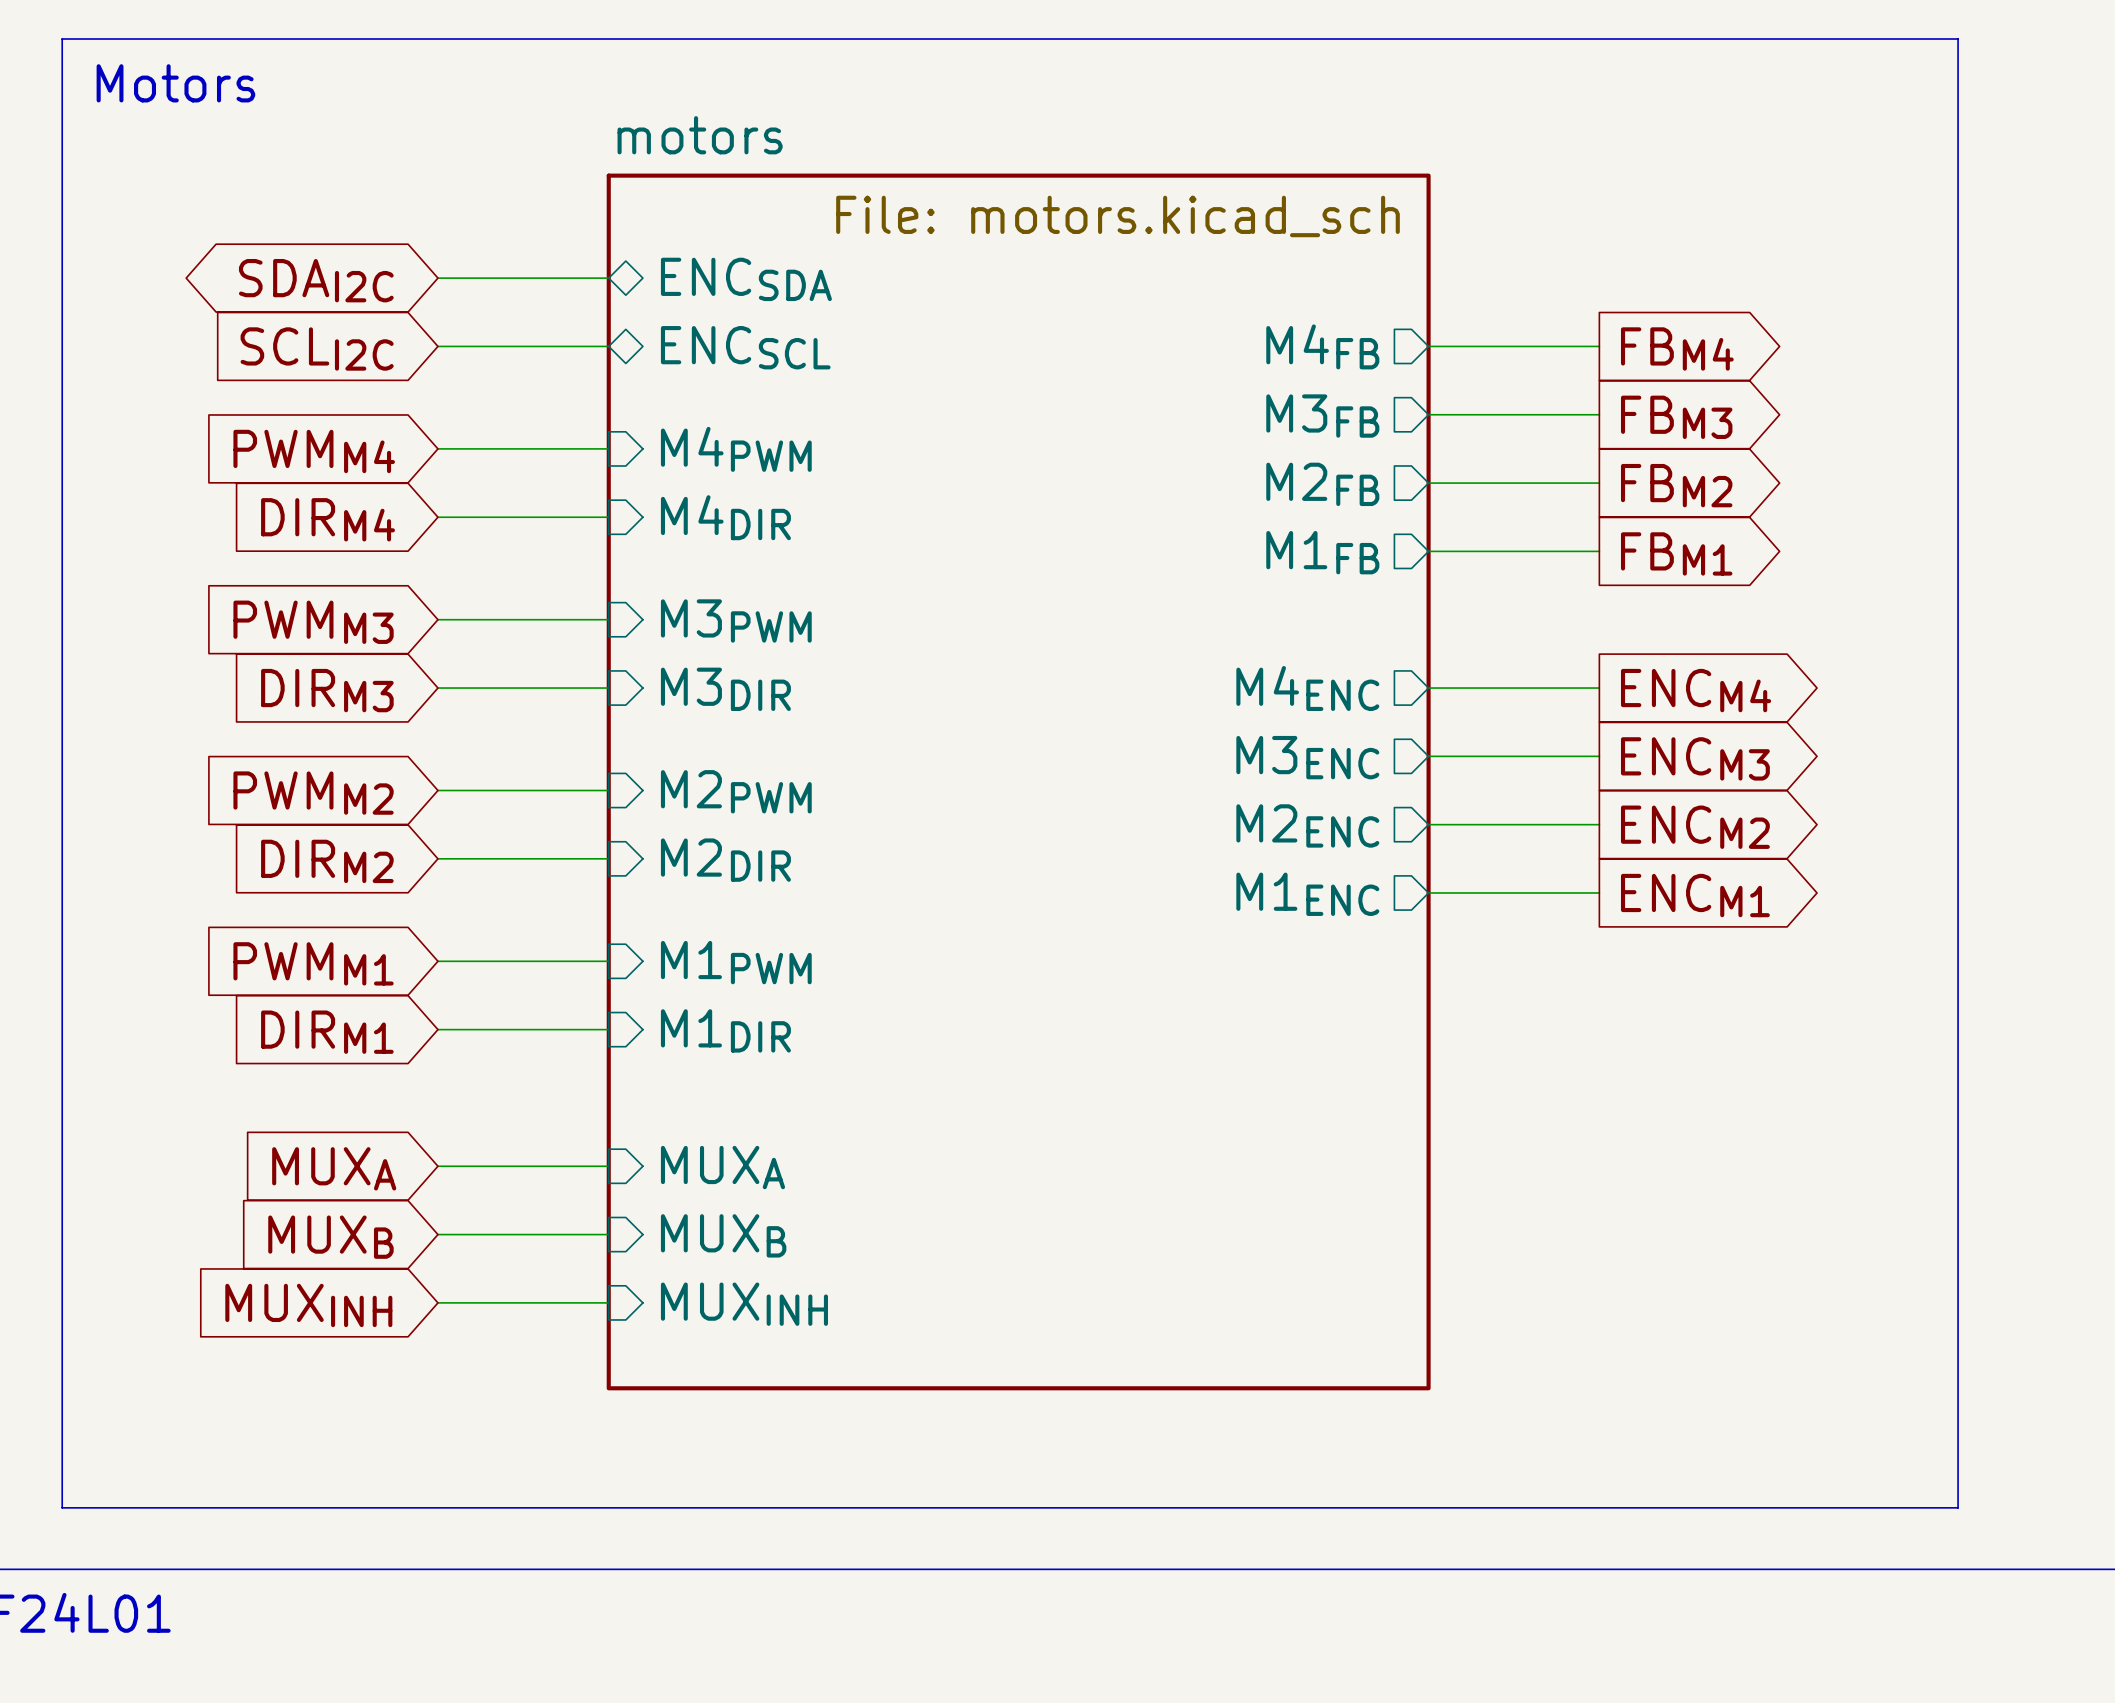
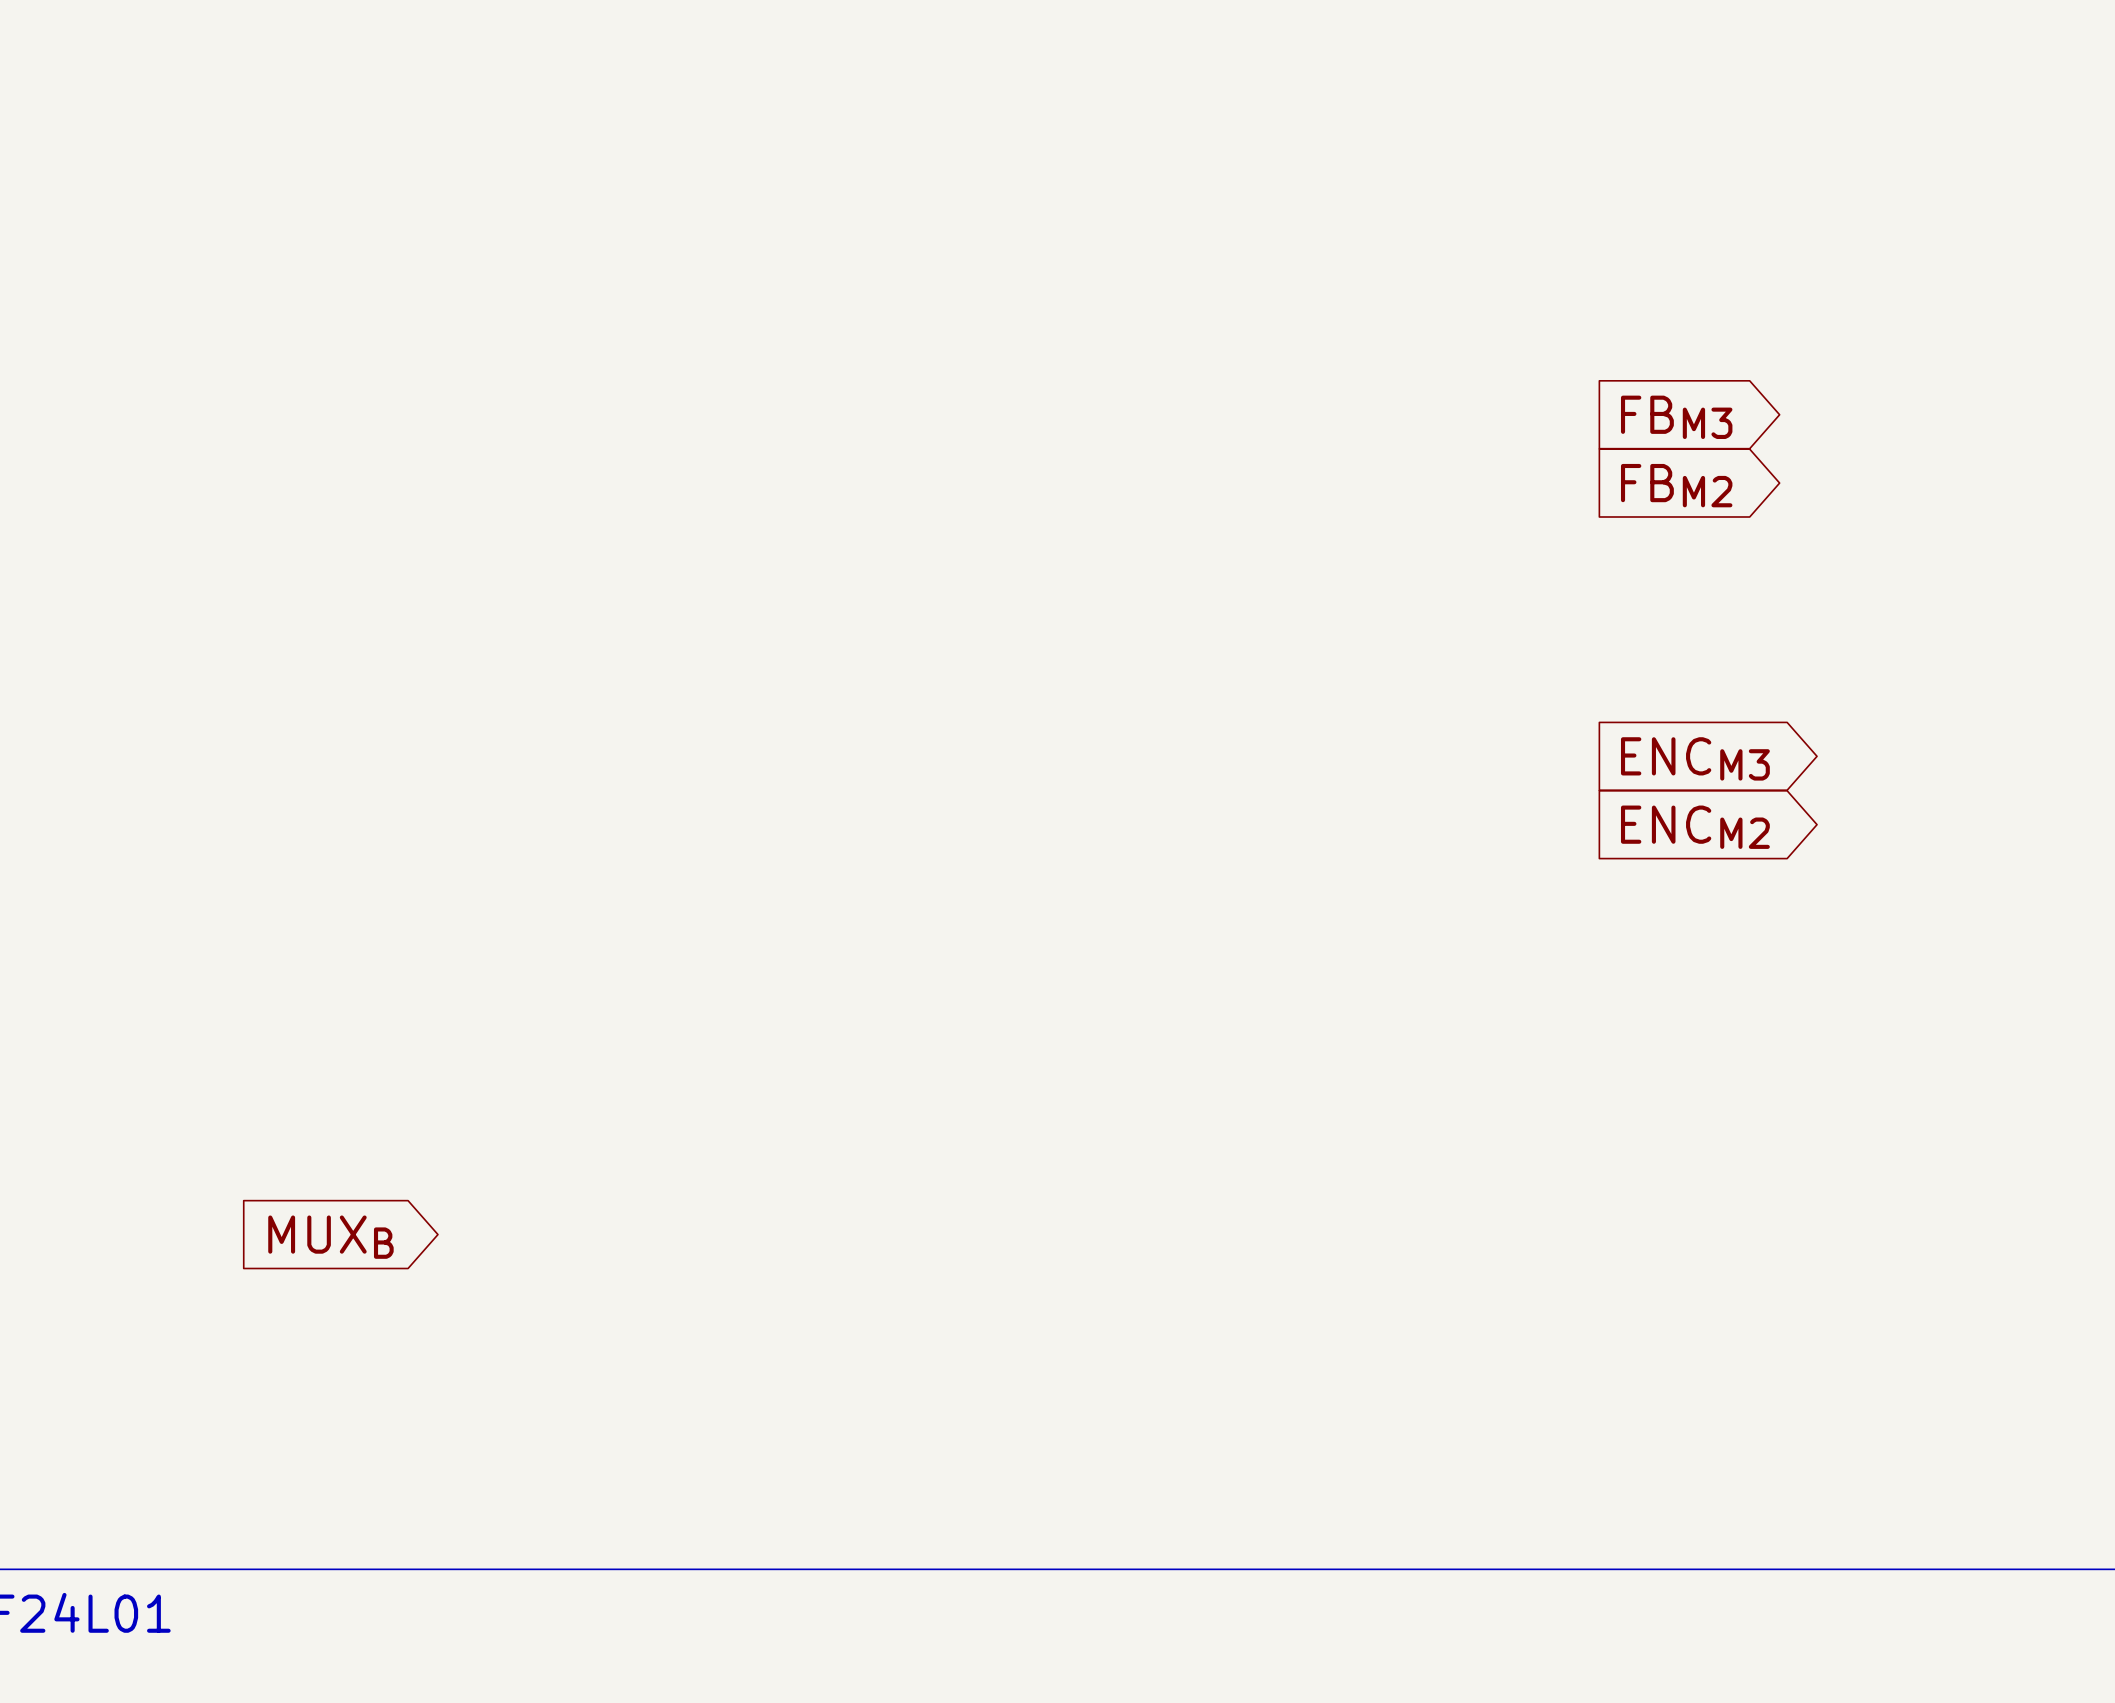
line: (62, 39) (1958, 39) (1958, 1507) (62, 1507) (62, 39) -> none
text: Motors (175, 83) -> none
wire: (437, 278) (608, 278) -> none
sheet pin: ENCSDA (746, 279) -> none
global label: SDAI2C (316, 280) -> none
wire: (437, 346) (608, 346) -> none
sheet pin: M4FB (1322, 346) -> none
wire: (1428, 346) (1599, 346) -> none
sheet pin: ENCSCL (745, 347) -> none
global label: SCLI2C (317, 348) -> none
global label: FBM4 (1677, 348) -> none
wire: (1428, 414) (1599, 414) -> none
sheet pin: M3FB (1322, 416) -> none
wire: (437, 448) (608, 448) -> none
sheet pin: M4PWM (736, 449) -> none
global label: PWMM4 (314, 451) -> none
wire: (1428, 483) (1599, 483) -> none
sheet pin: M2FB (1322, 484) -> none
wire: (437, 517) (608, 517) -> none
sheet pin: M4DIR (725, 517) -> none
global label: DIRM4 (328, 519) -> none
wire: (1428, 551) (1599, 551) -> none
sheet pin: M1FB (1322, 552) -> none
global label: FBM1 (1676, 553) -> none
wire: (437, 619) (608, 619) -> none
sheet pin: M3PWM (736, 620) -> none
global label: PWMM3 (313, 622) -> none
wire: (437, 688) (608, 688) -> none
sheet pin: M4ENC (1307, 688) -> none
wire: (1428, 688) (1599, 688) -> none
sheet pin: M3DIR (725, 689) -> none
global label: DIRM3 (327, 690) -> none
global label: ENCM4 (1696, 690) -> none
wire: (1428, 756) (1599, 756) -> none
sheet pin: M3ENC (1307, 757) -> none
sheet motors: File: motors.kicad_sch (1018, 781) -> none
wire: (437, 790) (608, 790) -> none
sheet pin: M2PWM (736, 791) -> none
global label: PWMM2 (313, 793) -> none
wire: (1428, 824) (1599, 824) -> none
sheet pin: M2ENC (1307, 825) -> none
wire: (437, 858) (608, 858) -> none
sheet pin: M2DIR (725, 860) -> none
global label: DIRM2 (327, 861) -> none
wire: (1428, 892) (1599, 892) -> none
sheet pin: M1ENC (1307, 894) -> none
global label: ENCM1 (1695, 895) -> none
wire: (437, 961) (608, 961) -> none
sheet pin: M1PWM (736, 962) -> none
global label: PWMM1 (313, 963) -> none
wire: (437, 1029) (608, 1029) -> none
sheet pin: M1DIR (725, 1030) -> none
global label: DIRM1 (327, 1032) -> none
wire: (437, 1166) (608, 1166) -> none
sheet pin: MUXA (722, 1167) -> none
global label: MUXA (334, 1168) -> none
wire: (437, 1234) (608, 1234) -> none
sheet pin: MUXB (723, 1235) -> none
wire: (437, 1302) (608, 1302) -> none
sheet pin: MUXINH (744, 1304) -> none
global label: MUXINH (308, 1305) -> none

